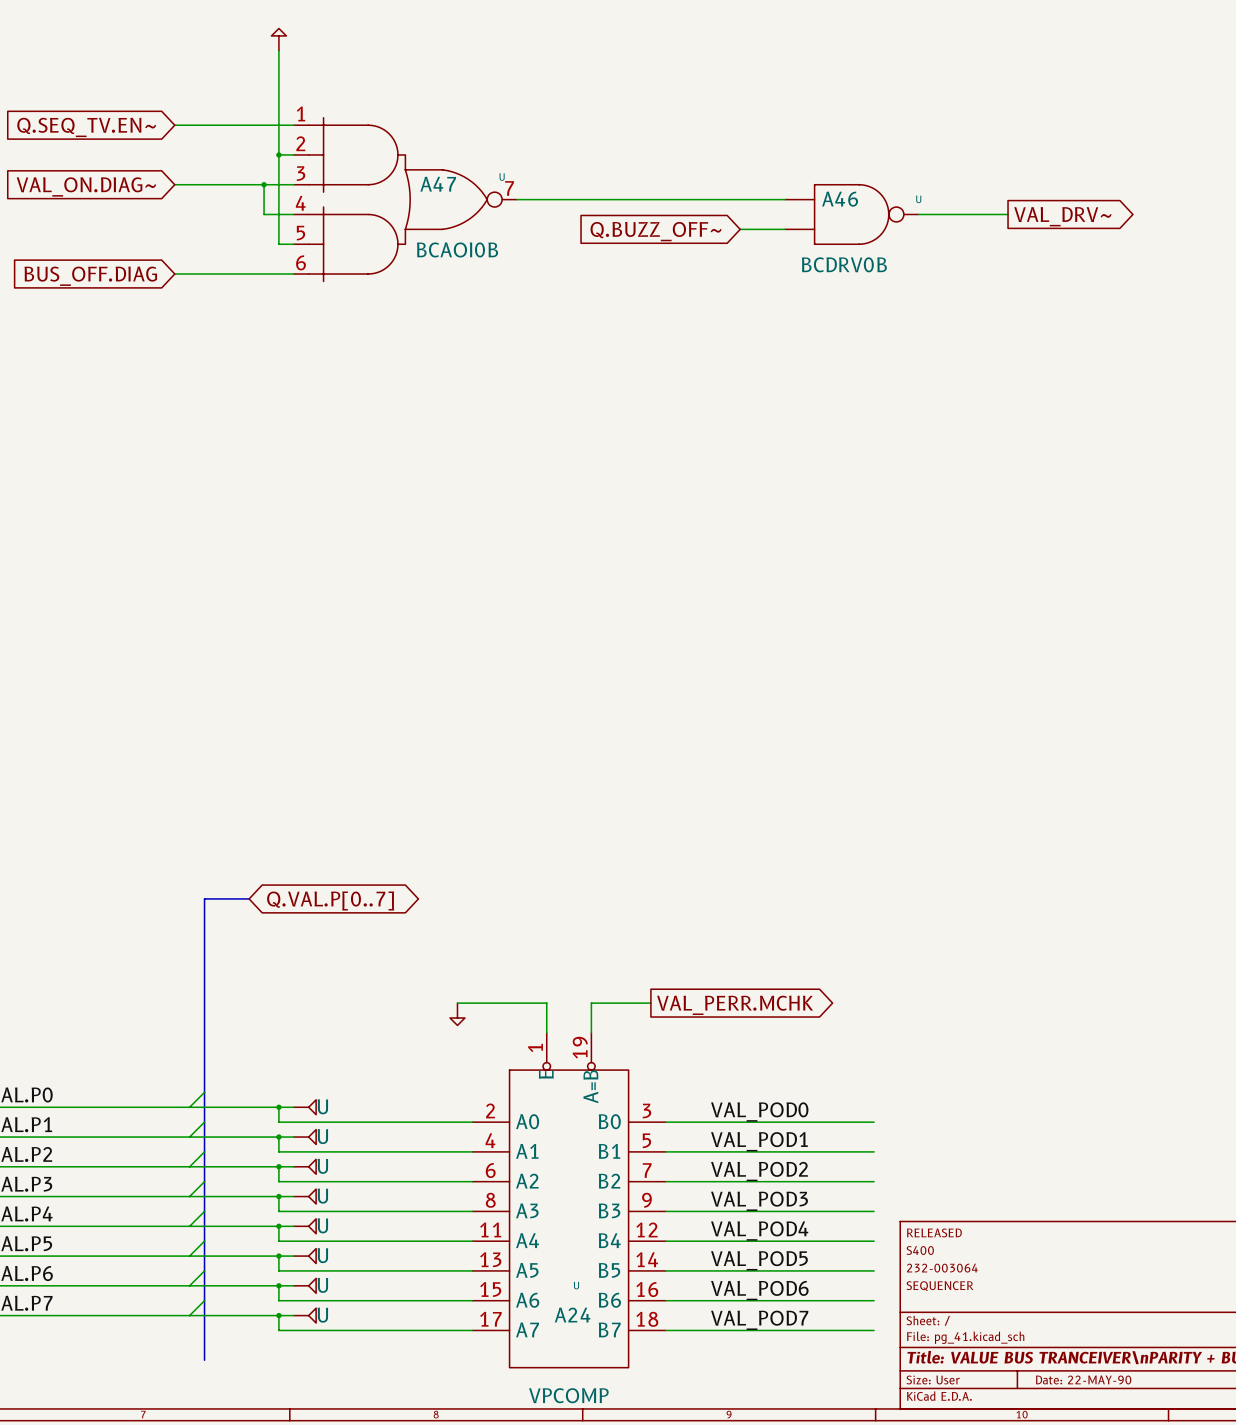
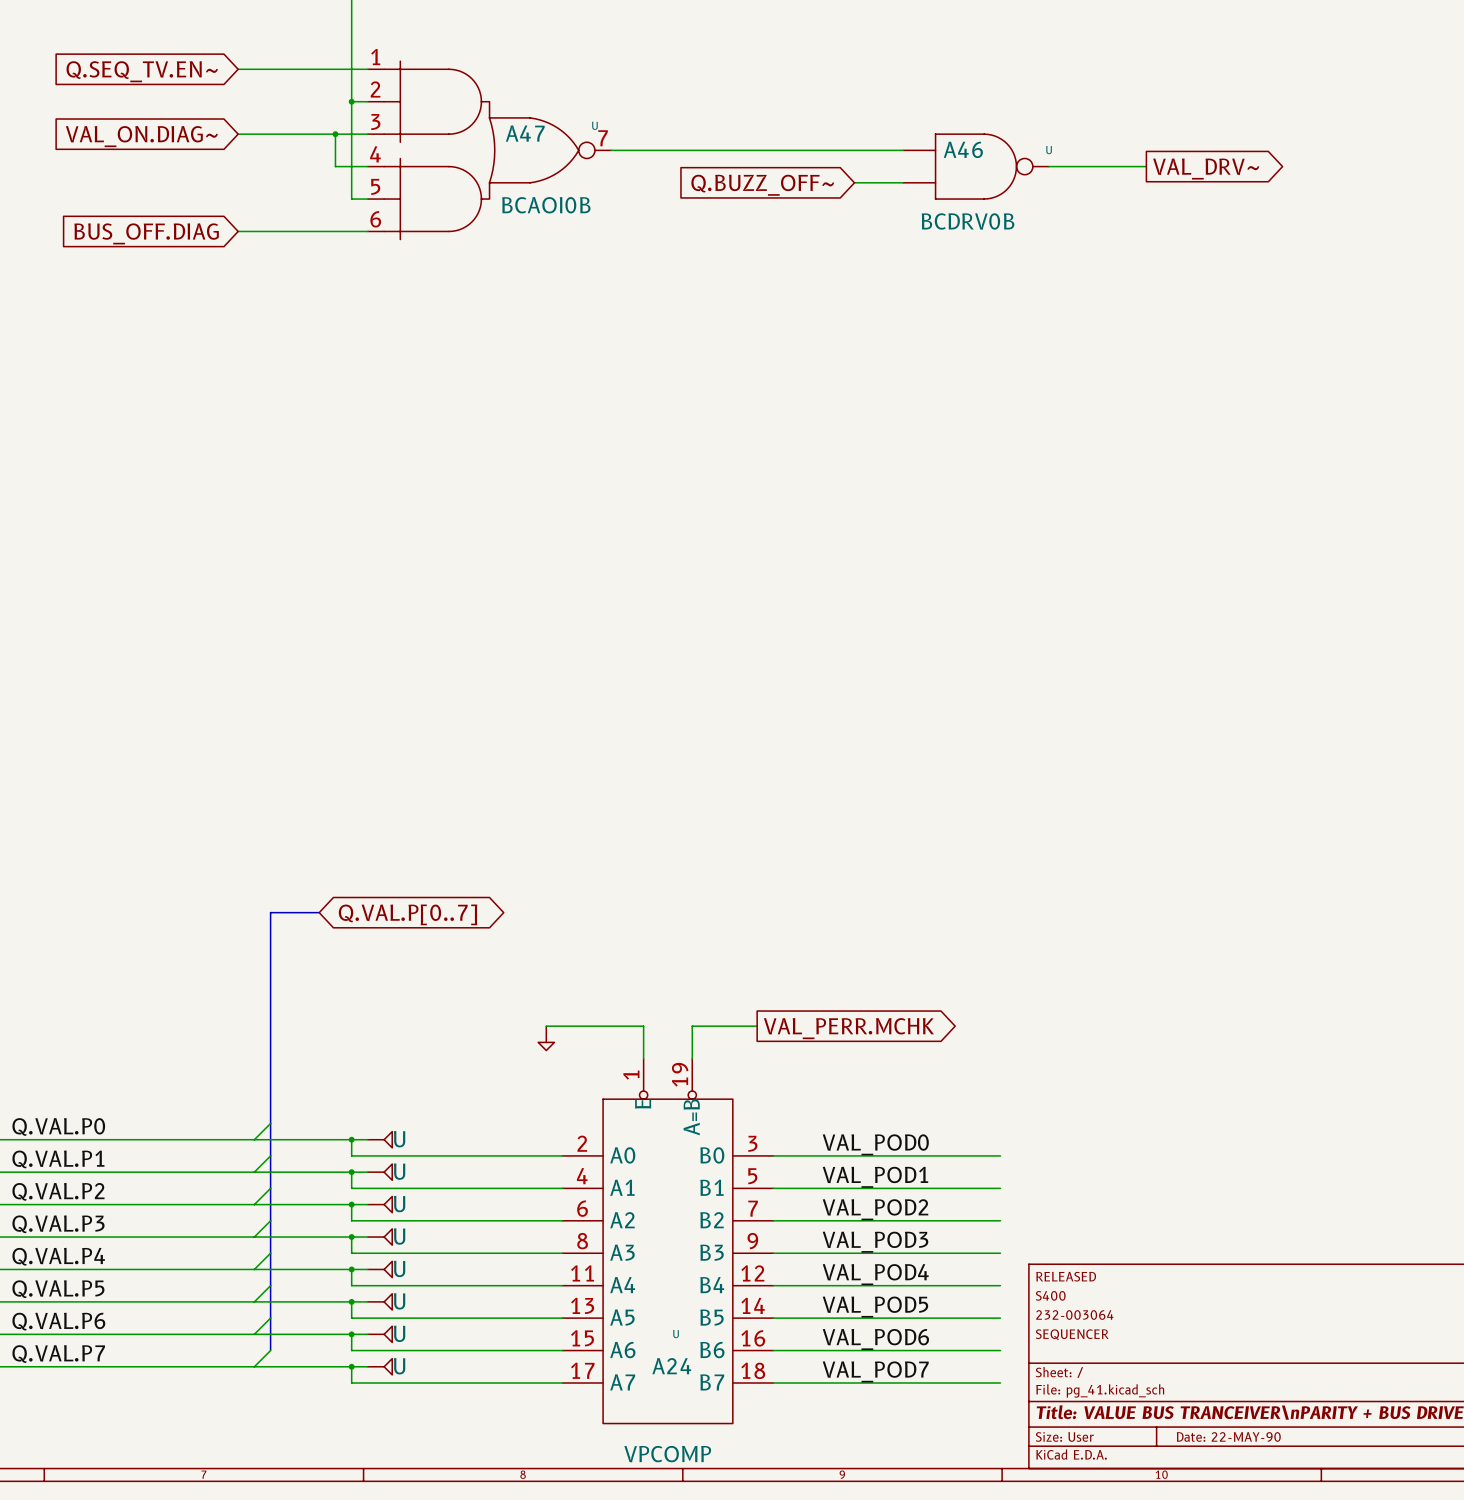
bus: (204, 1300) (204, 1360) -> none

